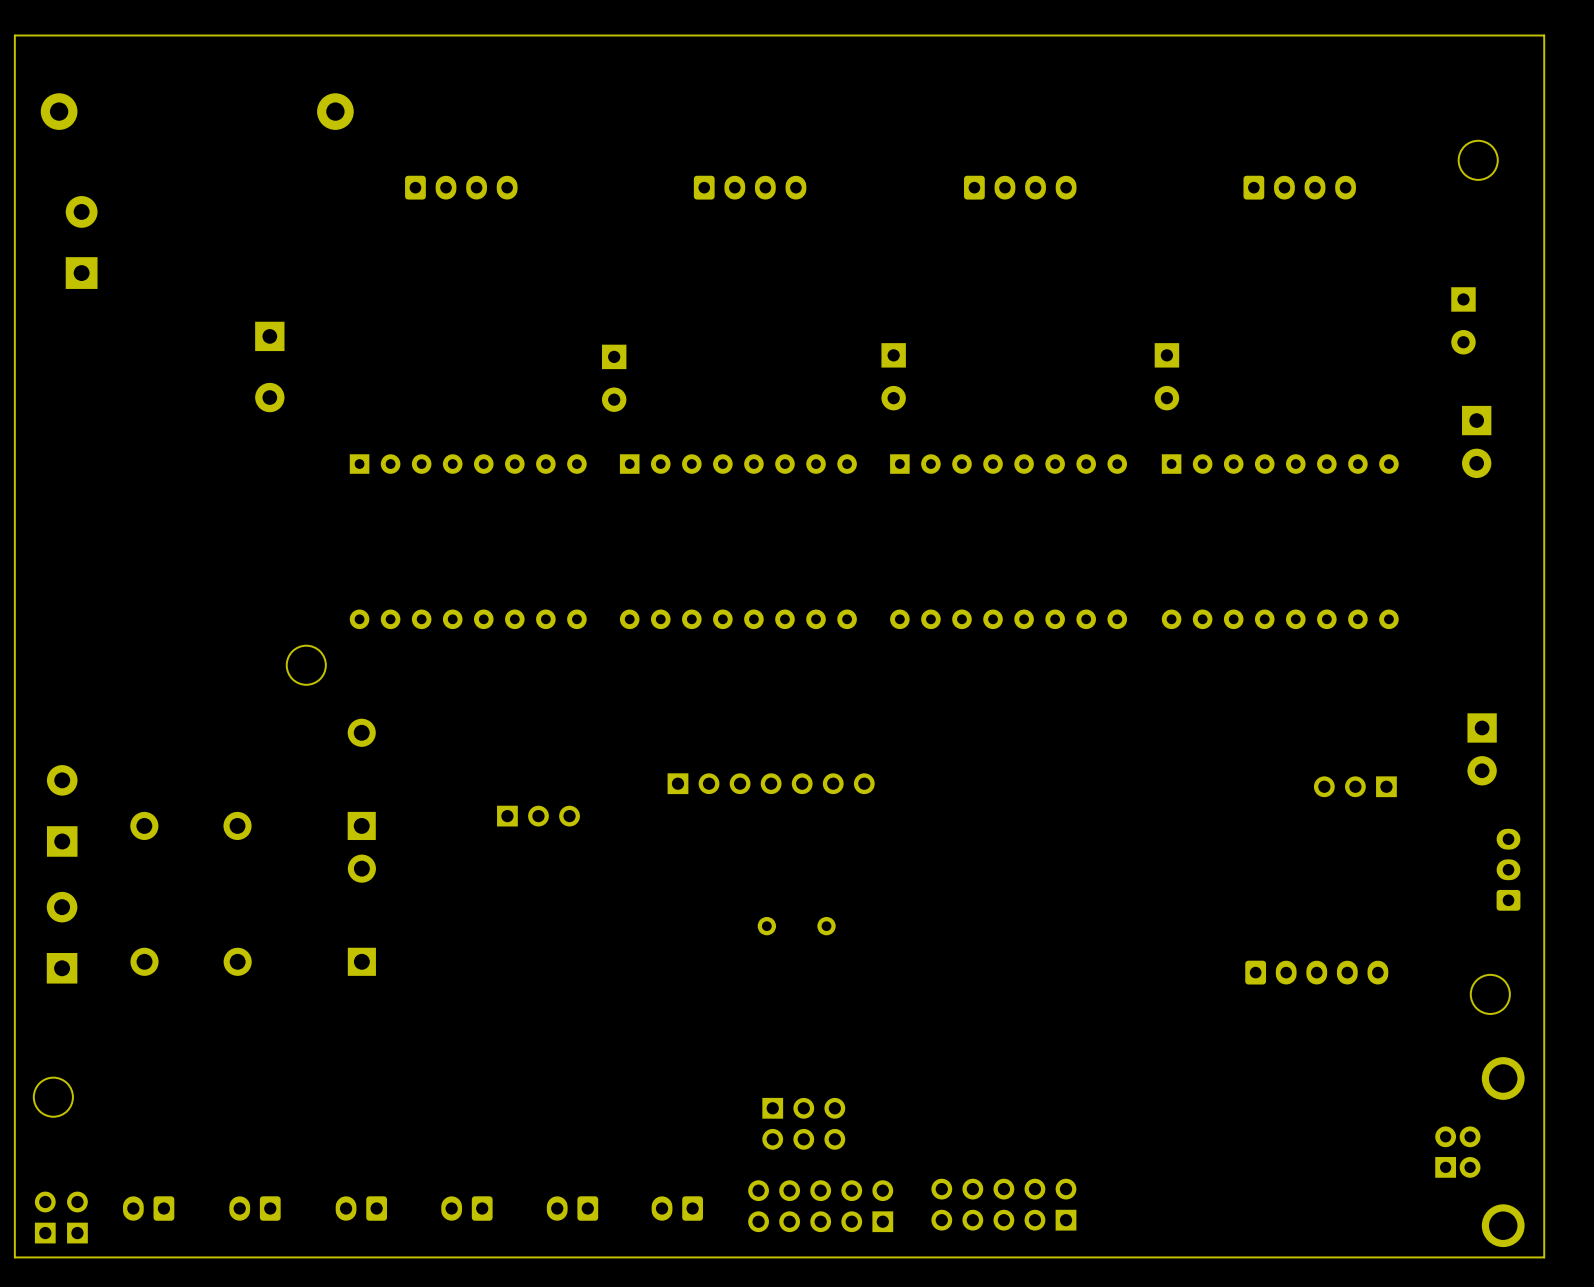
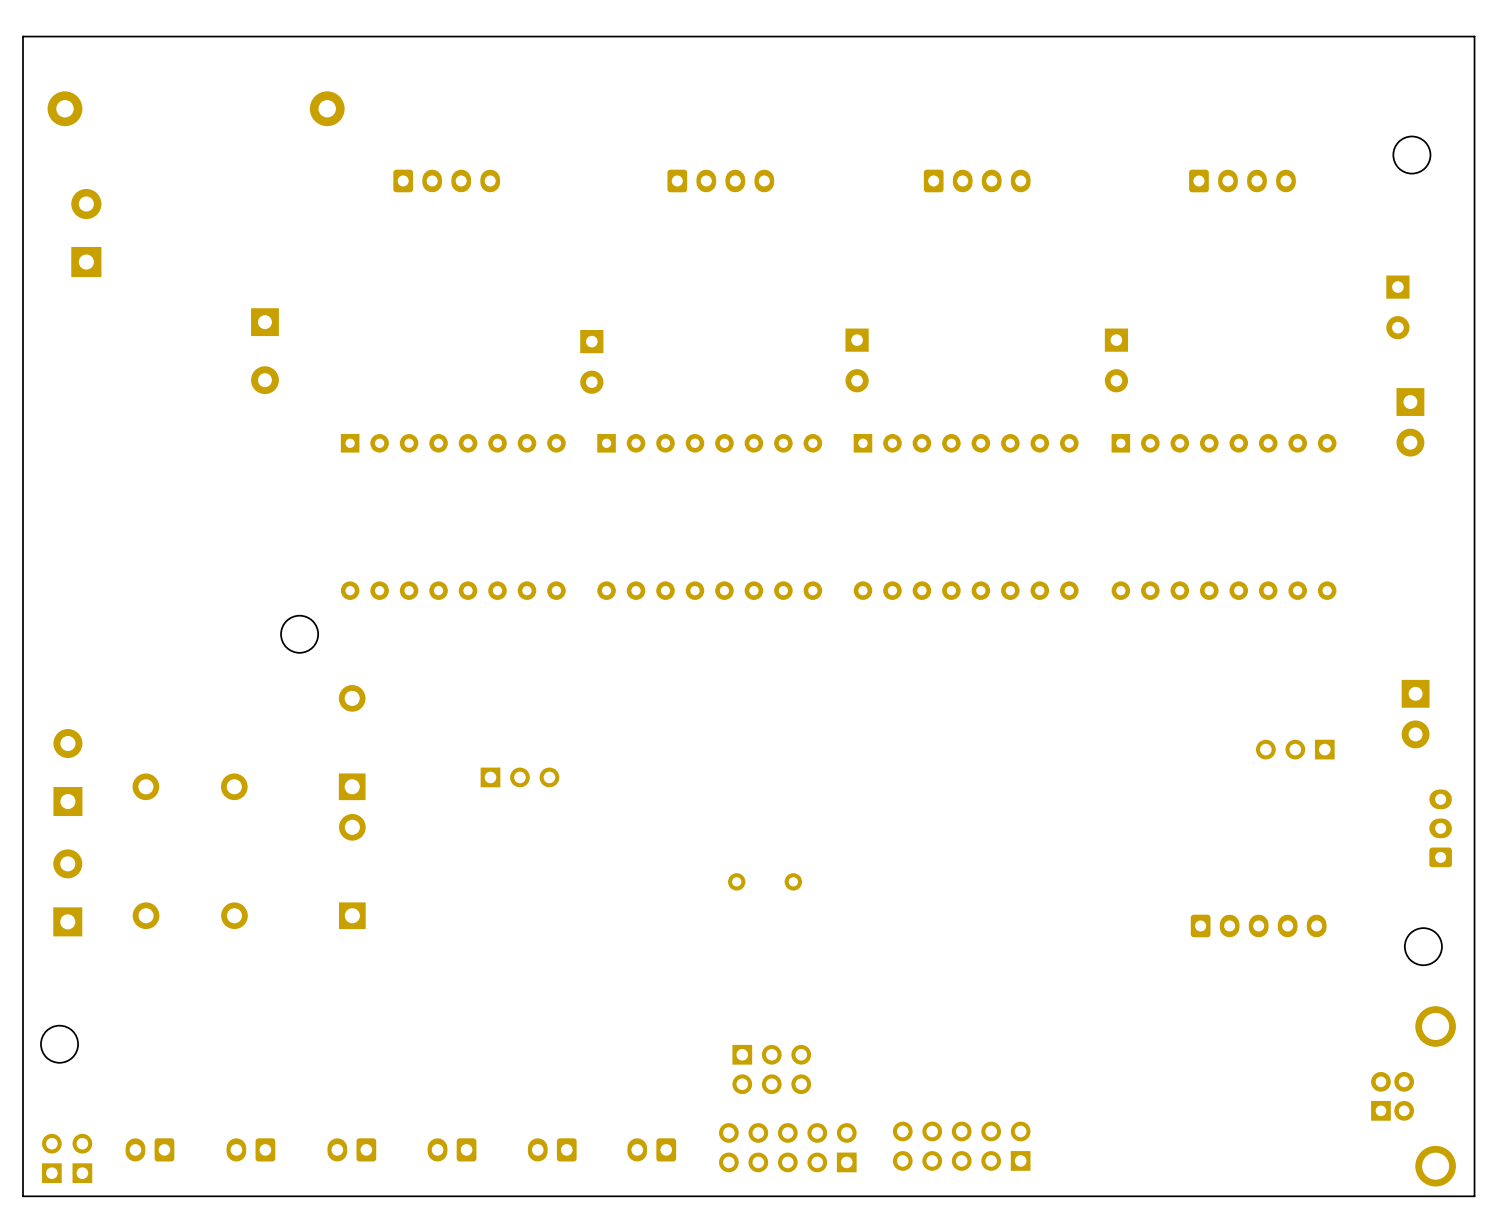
part: (771, 783) -> none

